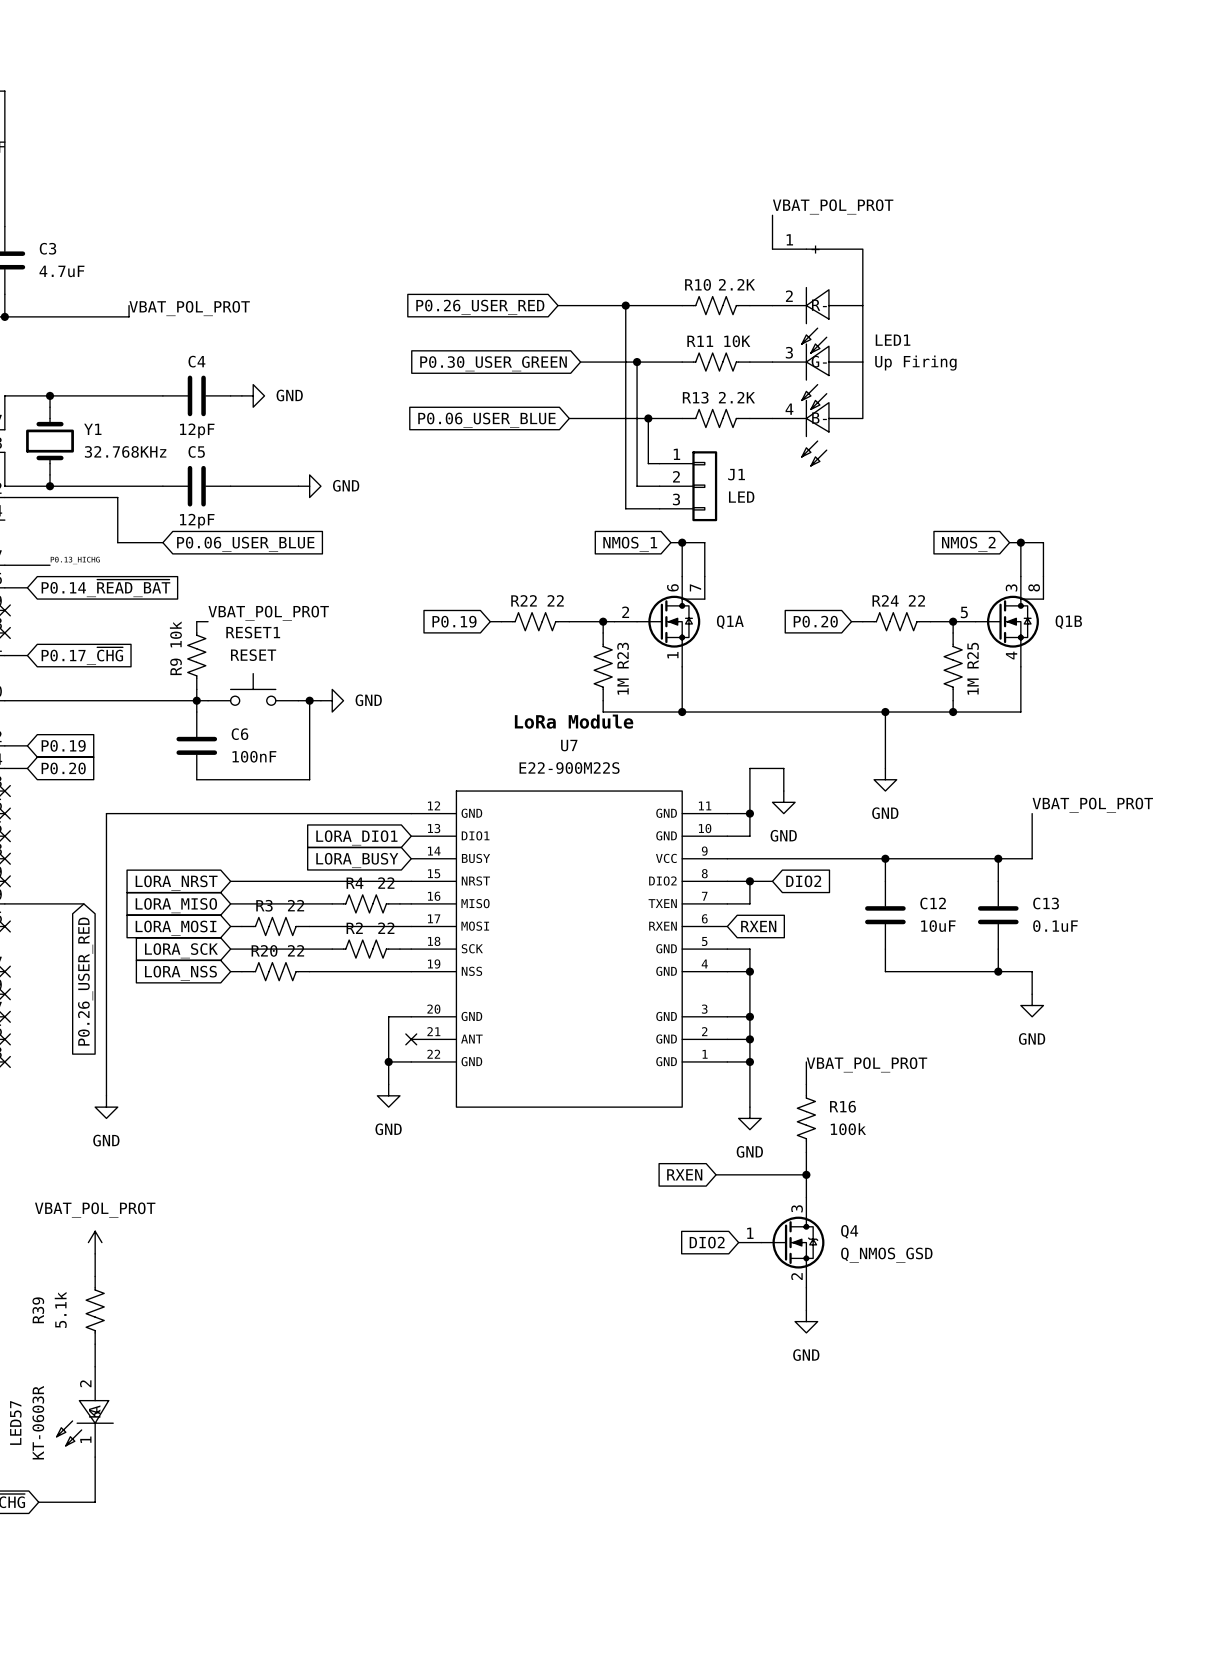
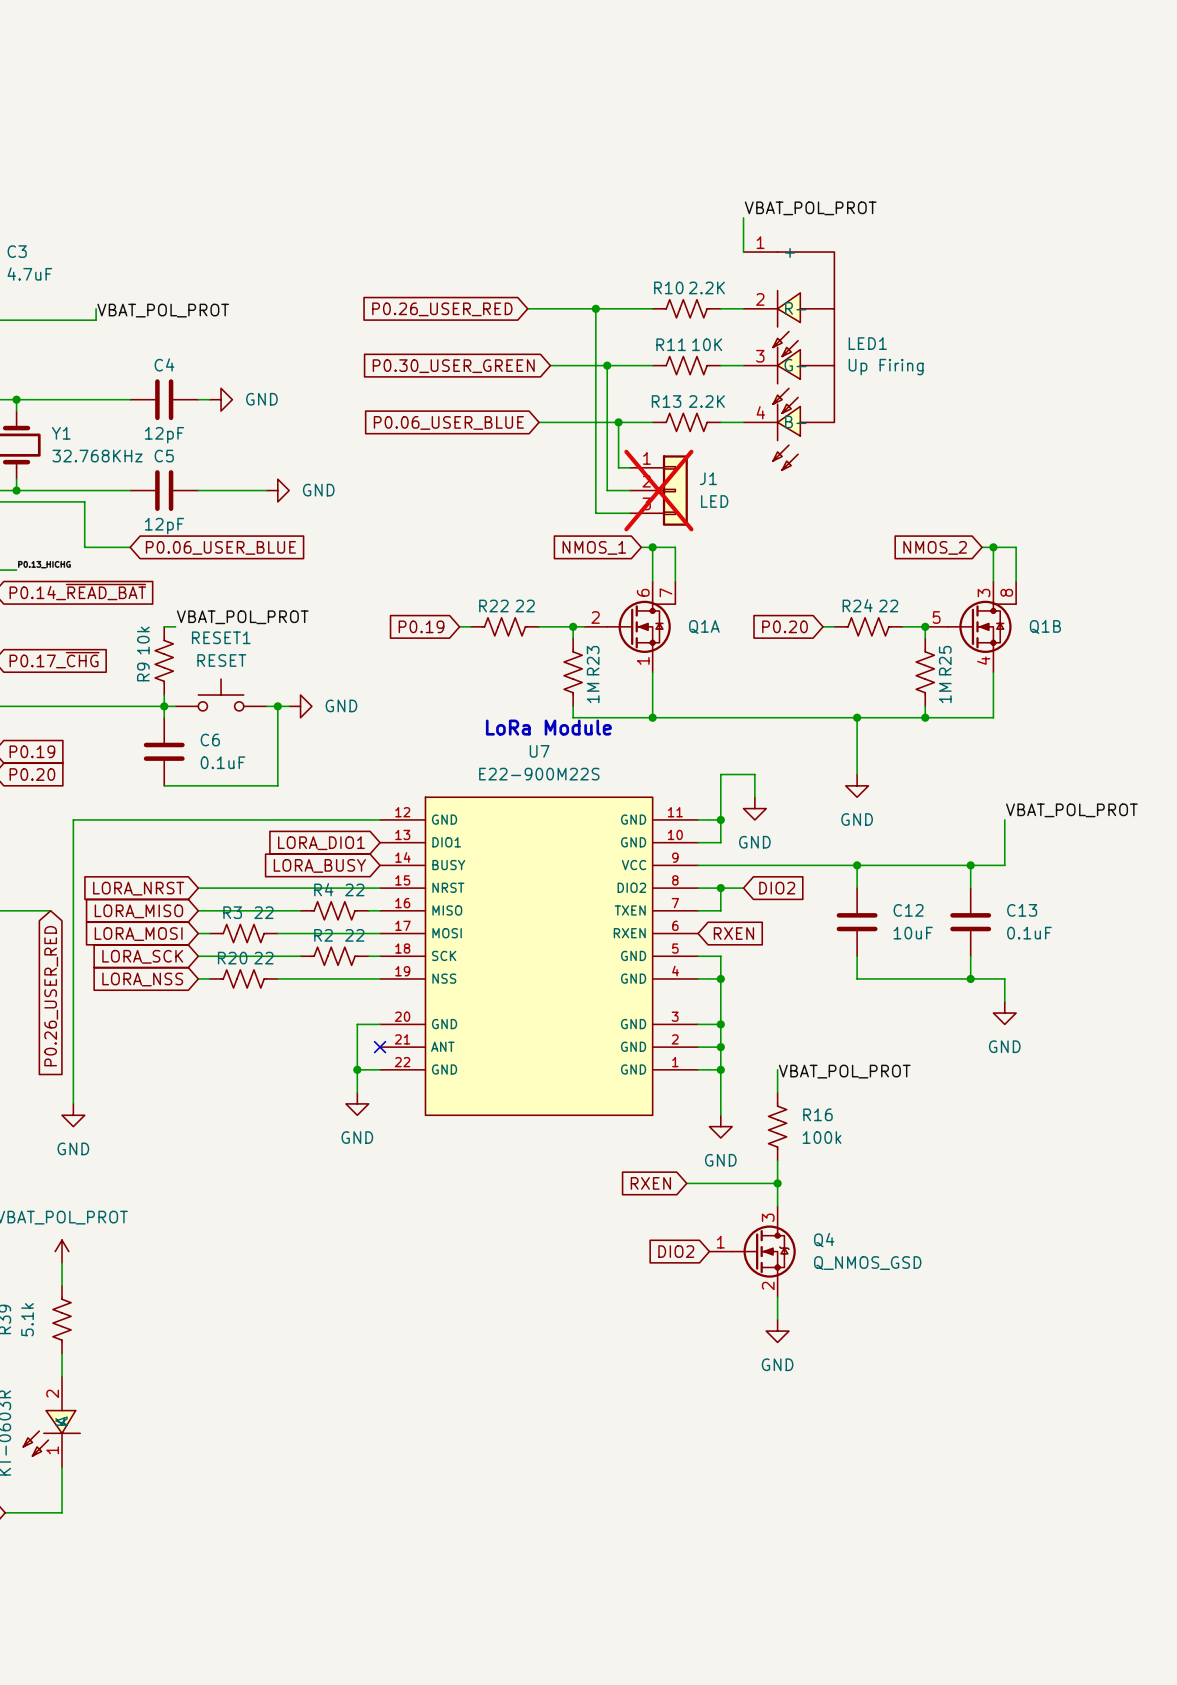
J1 do-not-place cross: none -> (658, 490)
C6 value: 100nF (254, 756) -> 0.1uF (223, 762)

